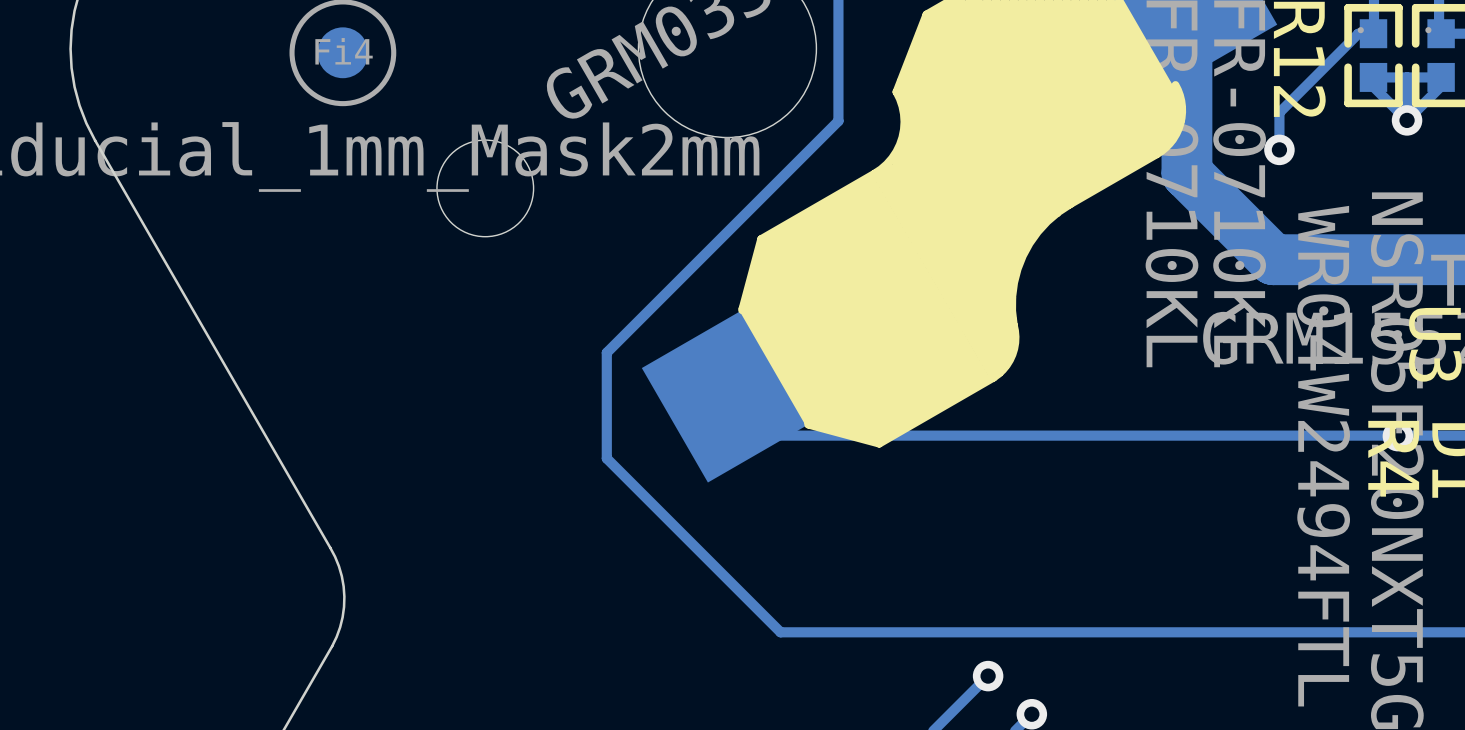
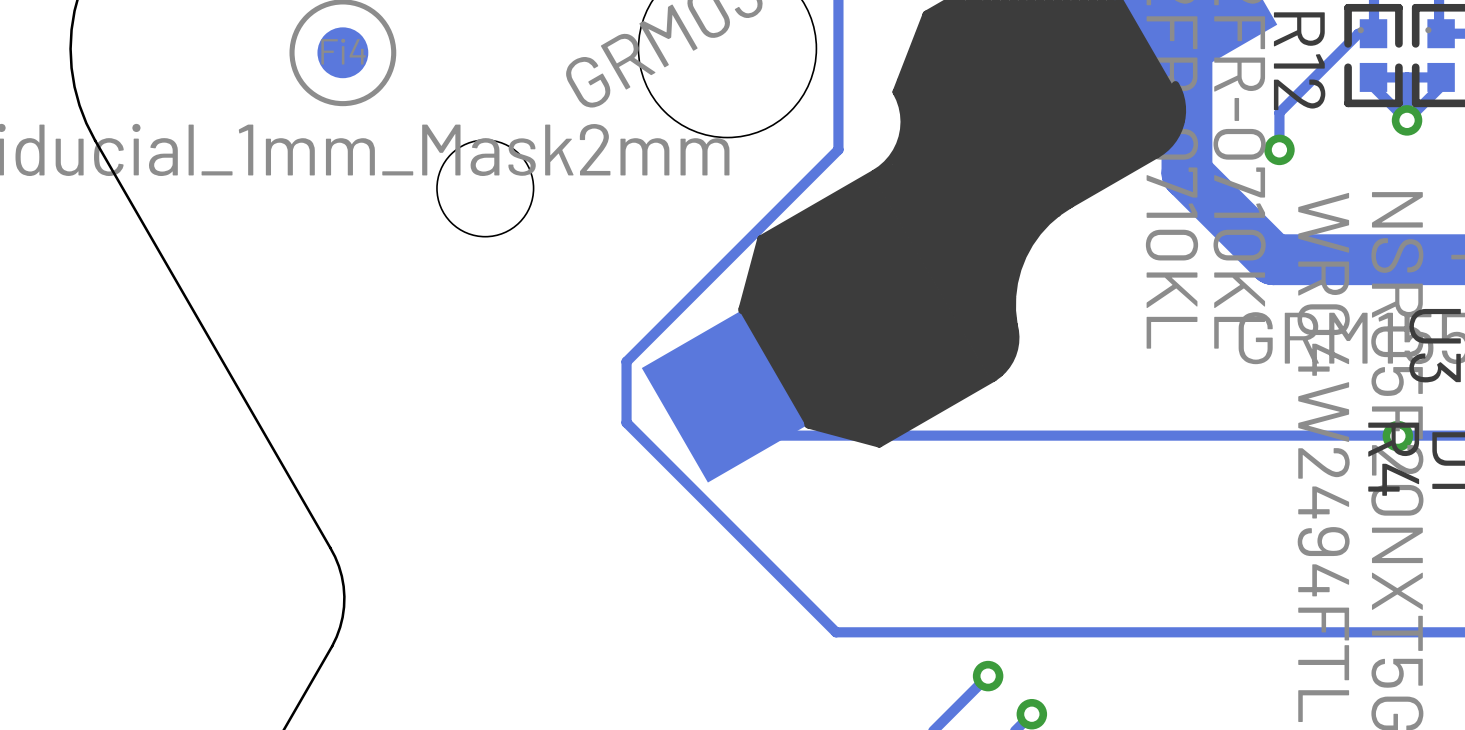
track: (838, 121) (606, 352) (606, 458) (780, 632) (836, 632) -> (838, 121) (838, 149) (626, 361) (626, 422) (836, 632)

